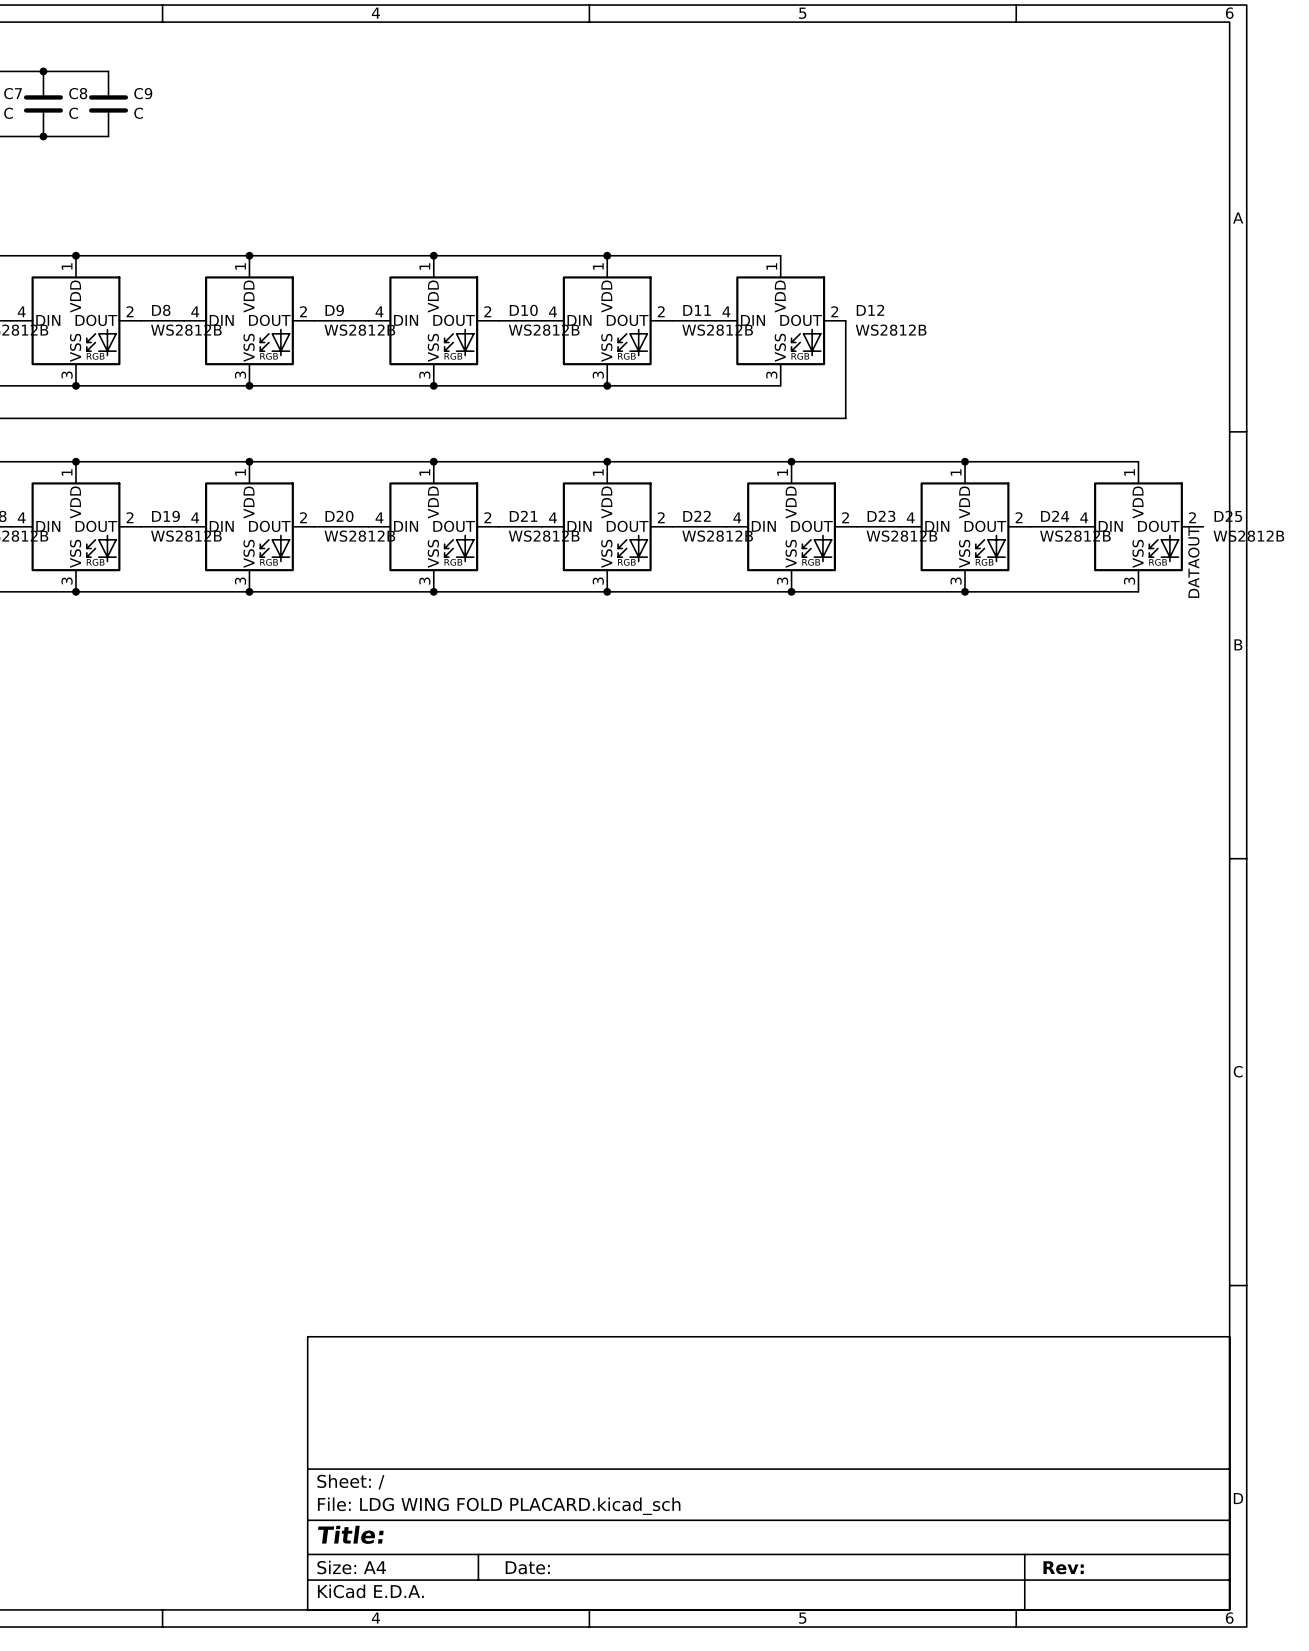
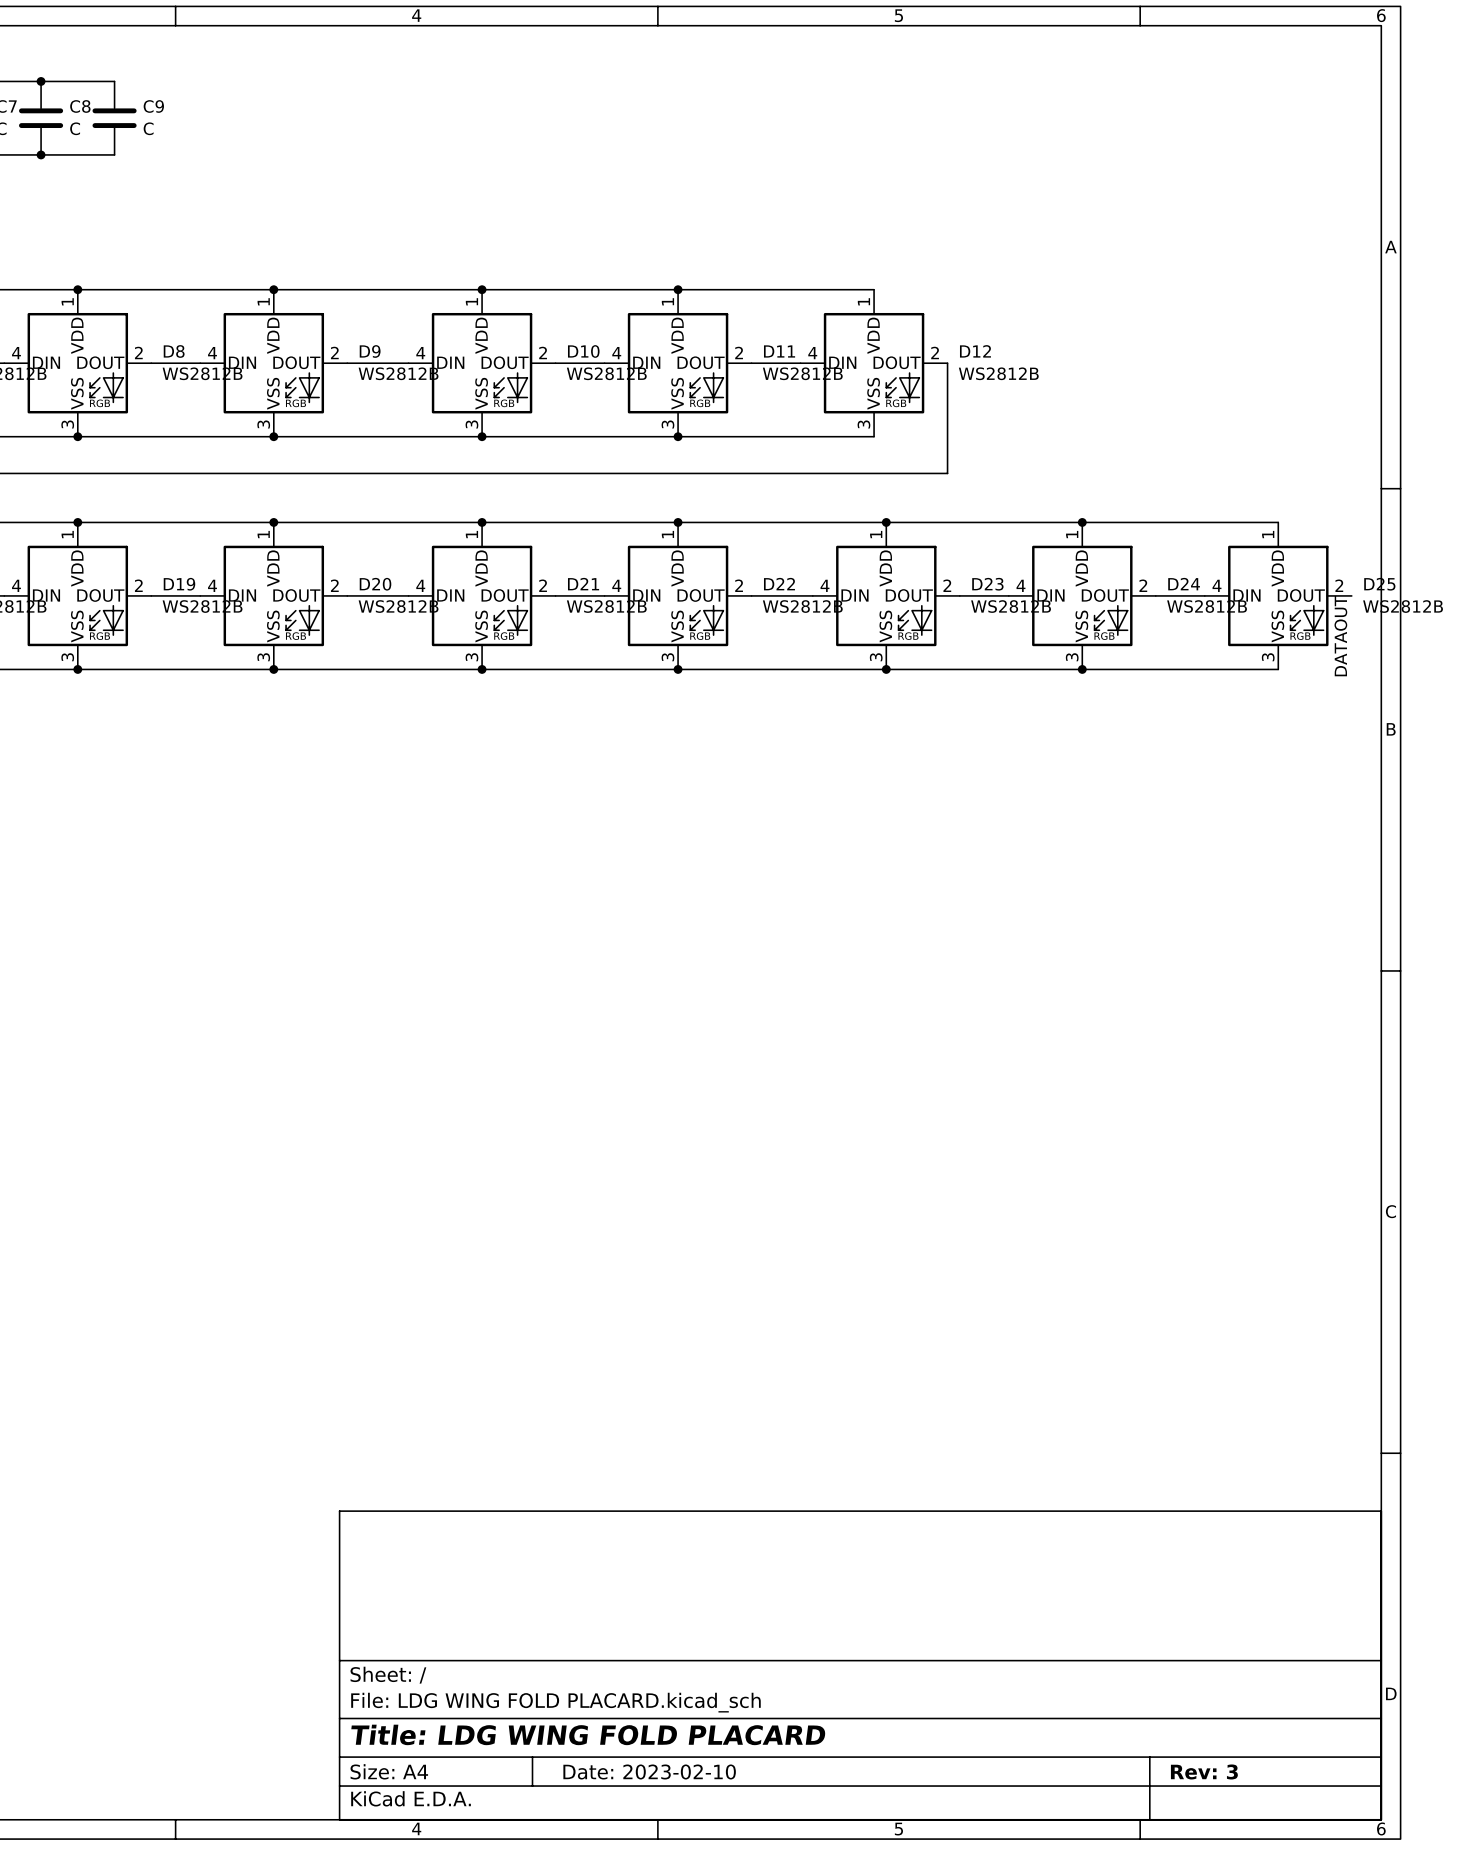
title block: Title: (350, 1534) -> Title: LDG WING FOLD PLACARD (588, 1734)
title block: Date: (527, 1567) -> Date: 2023-02-10 (649, 1771)
title block: Rev: (1063, 1567) -> Rev: 3 (1204, 1771)

